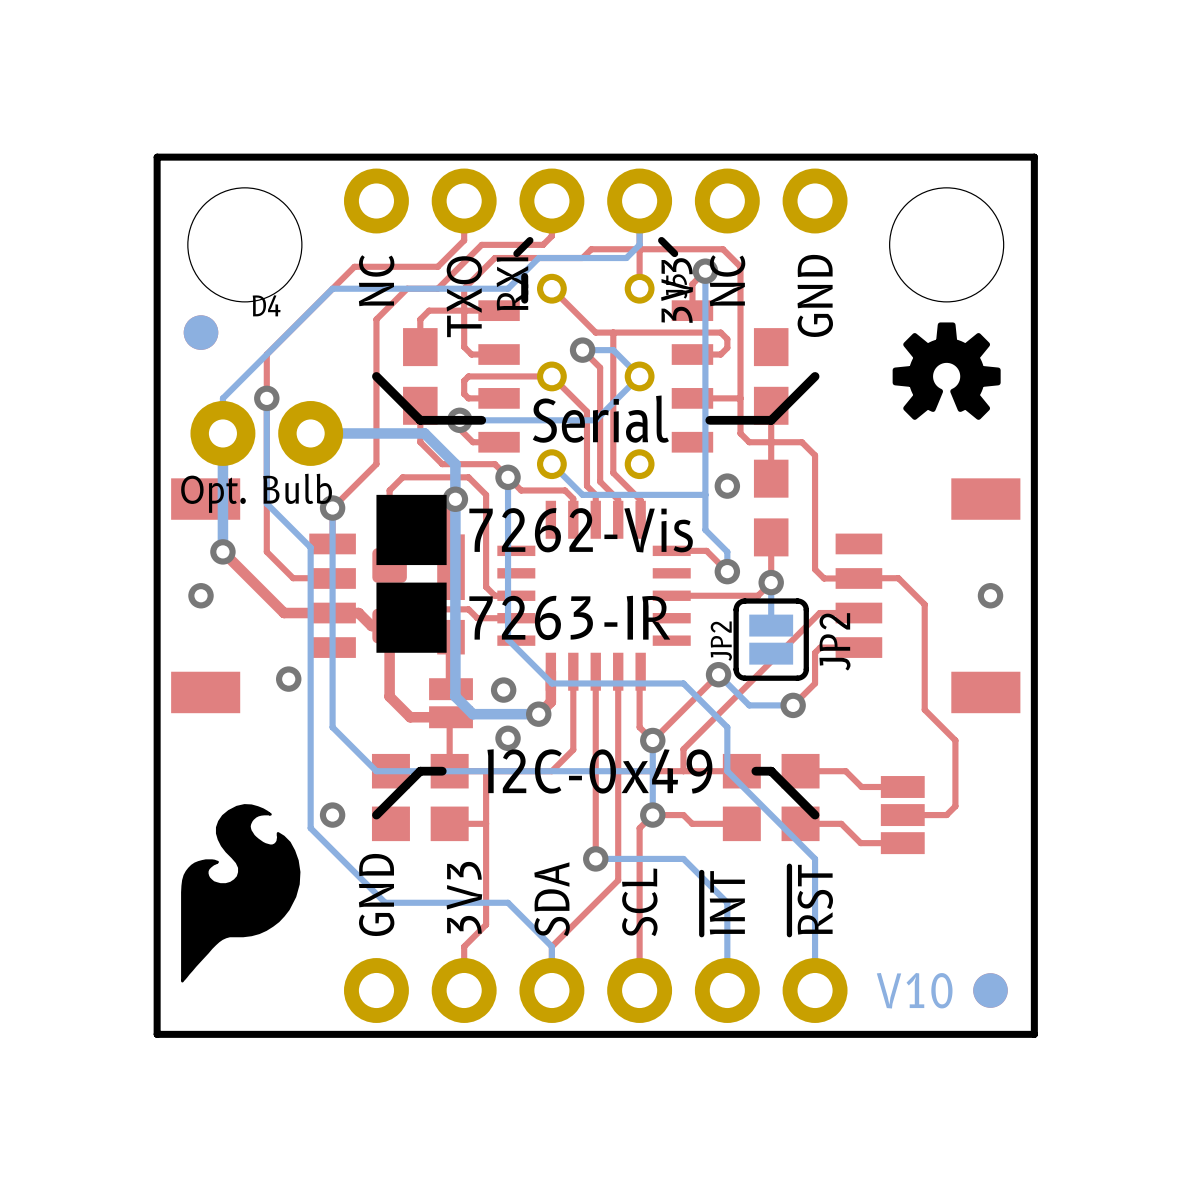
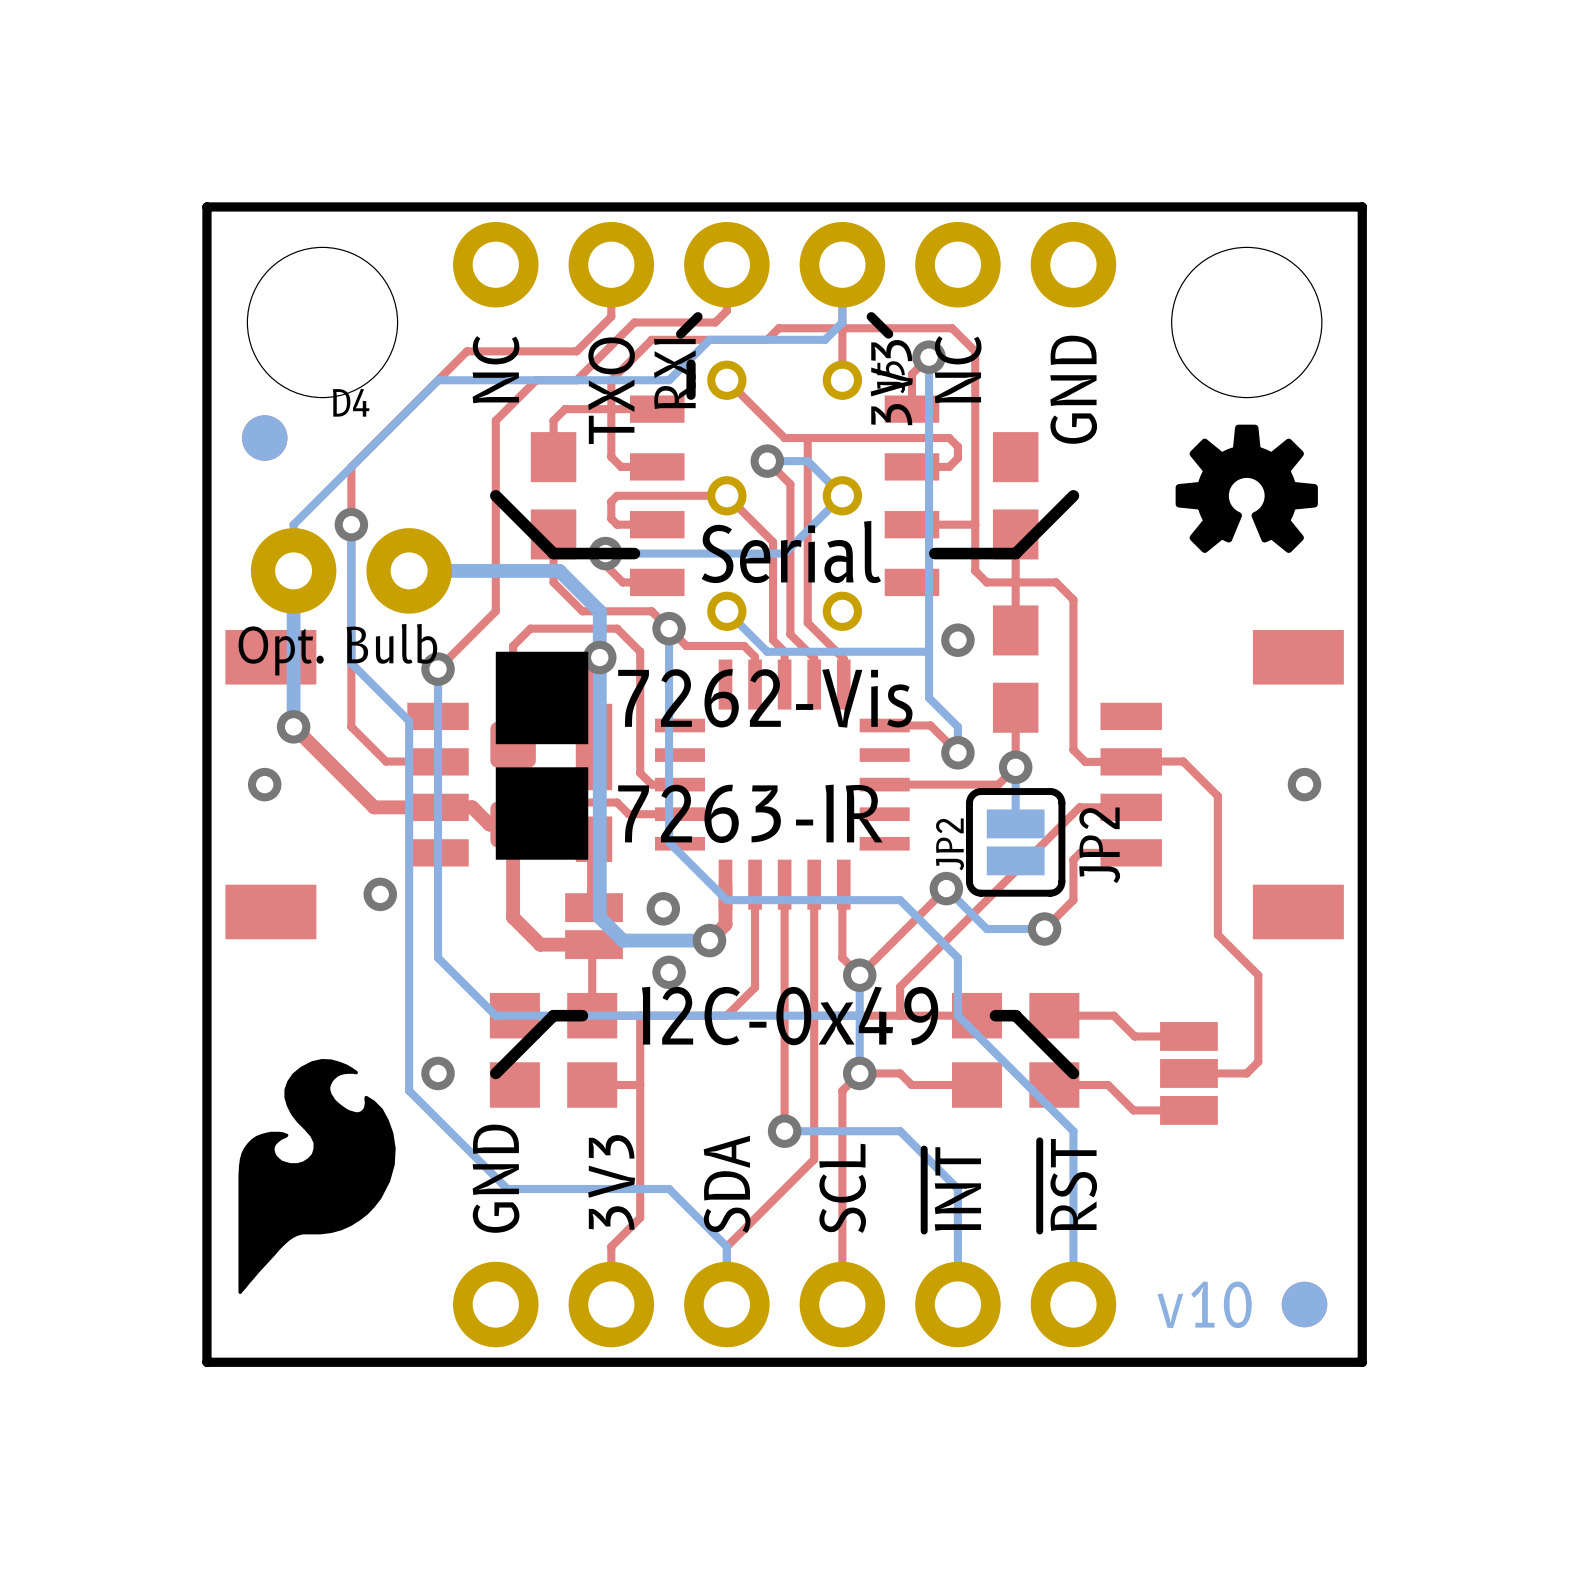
text: V10 (914, 990) -> v10 (1204, 1304)

